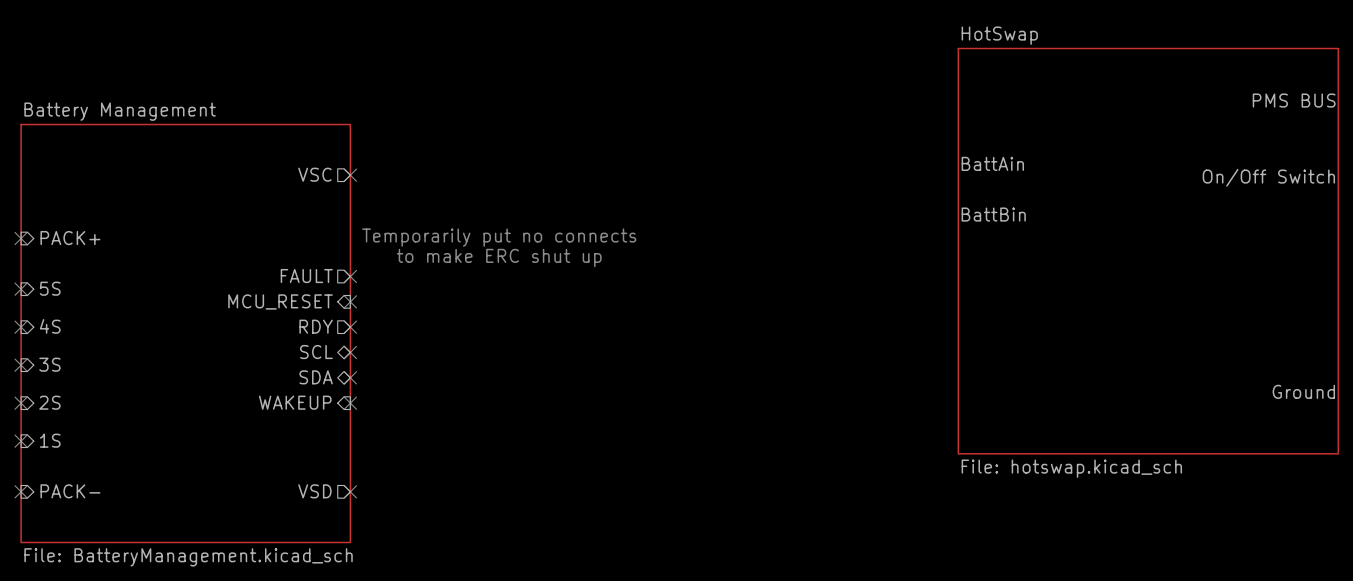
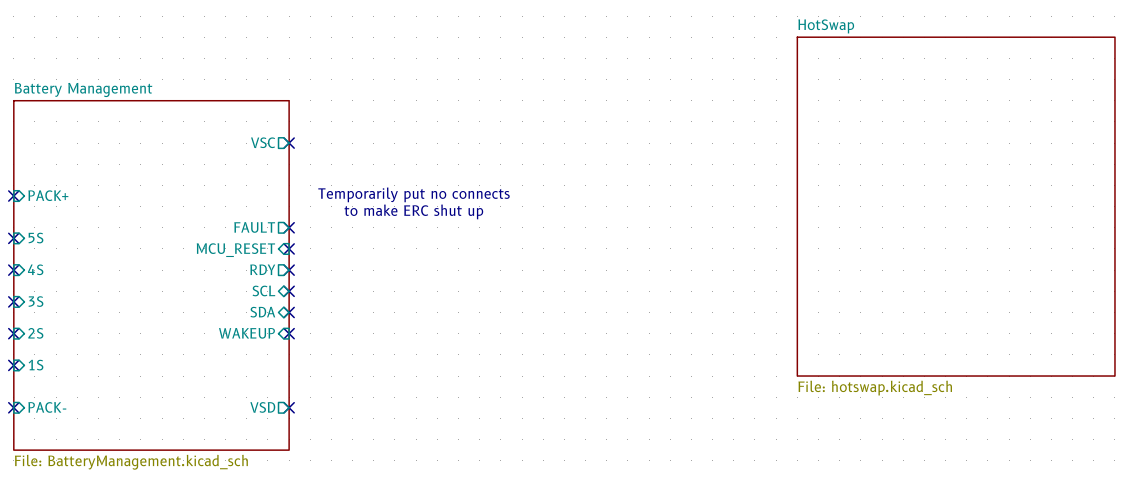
label: PMS BUS (1294, 100) -> none
label: BattAin (992, 163) -> none
label: On/Off Switch (1268, 177) -> none
label: BattBin (993, 214) -> none
label: Ground (1303, 391) -> none

